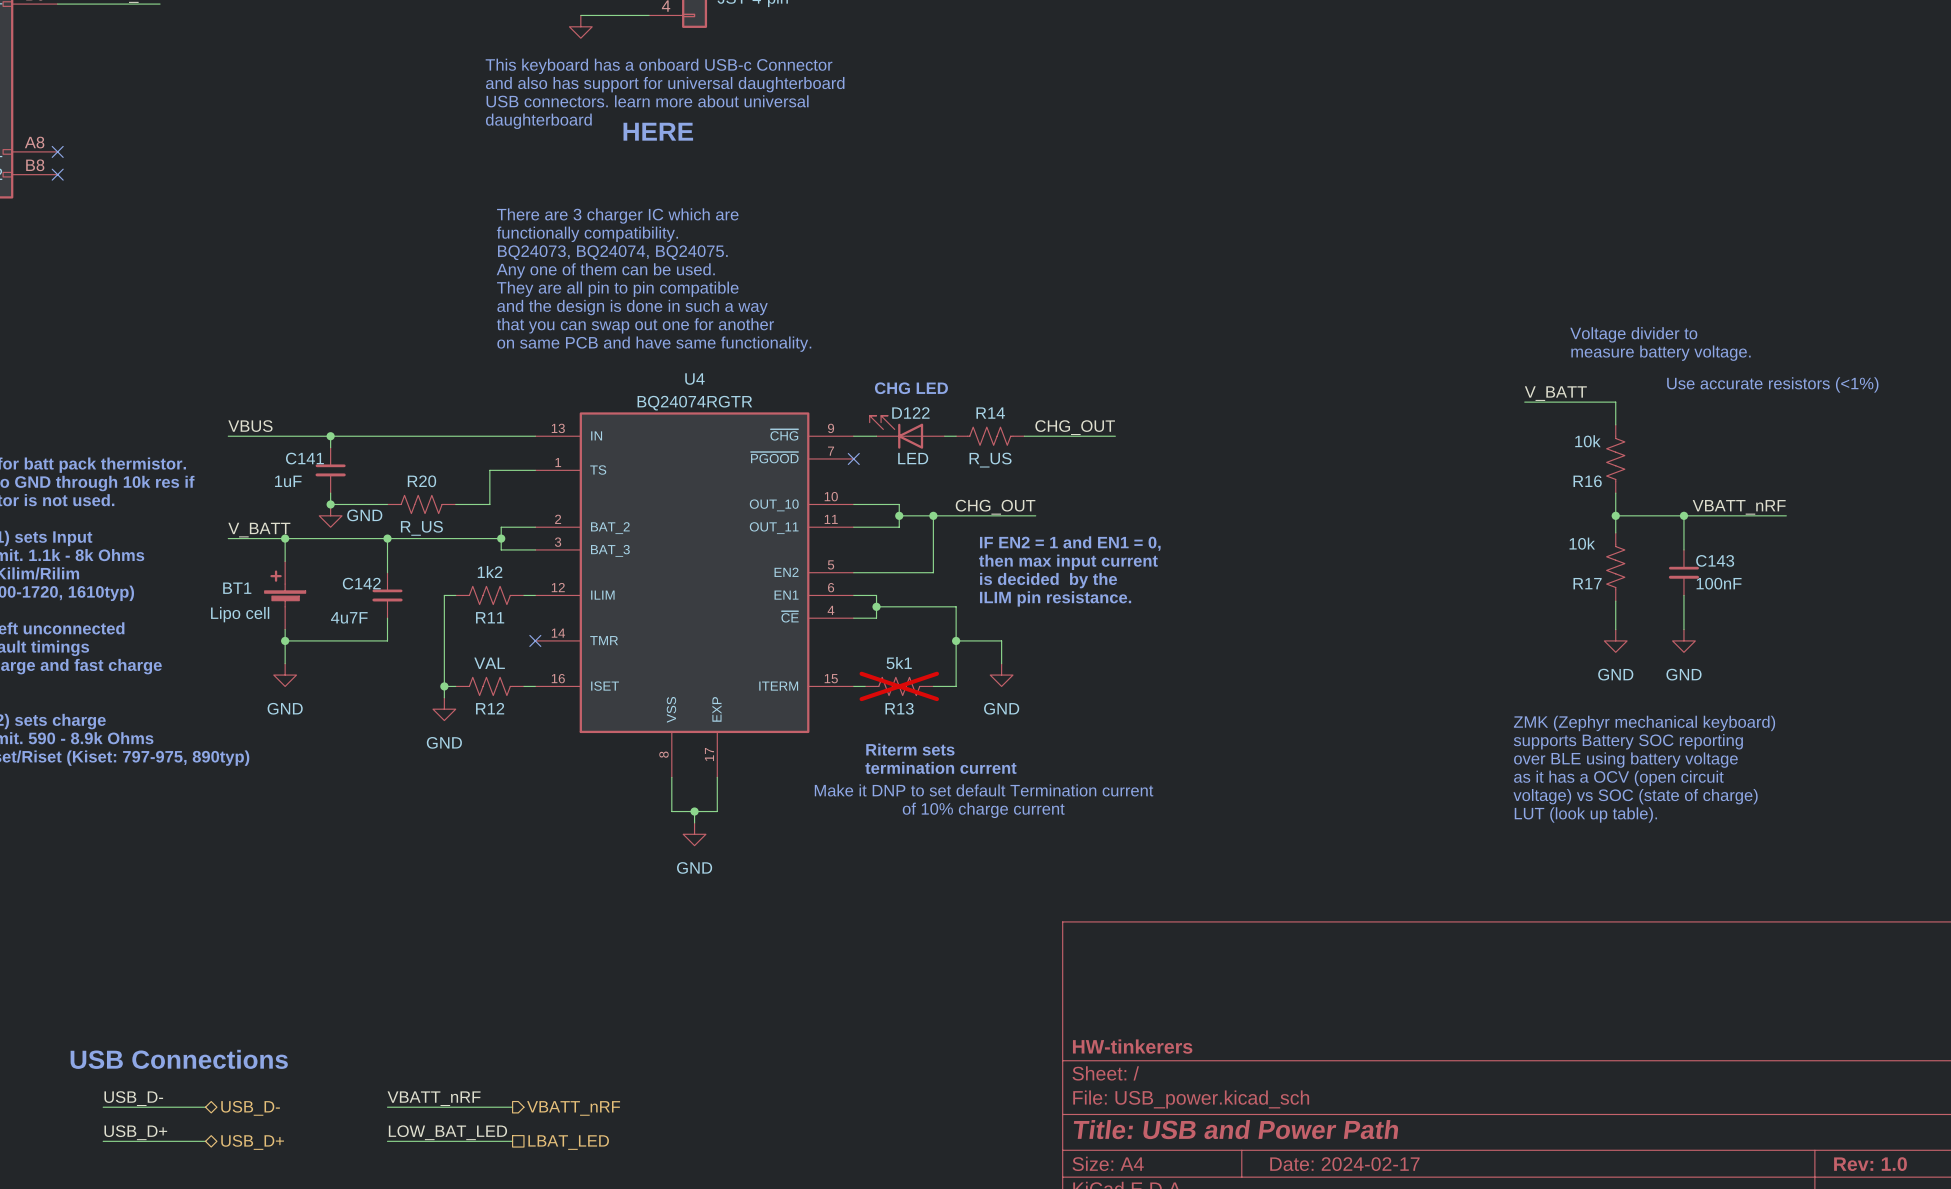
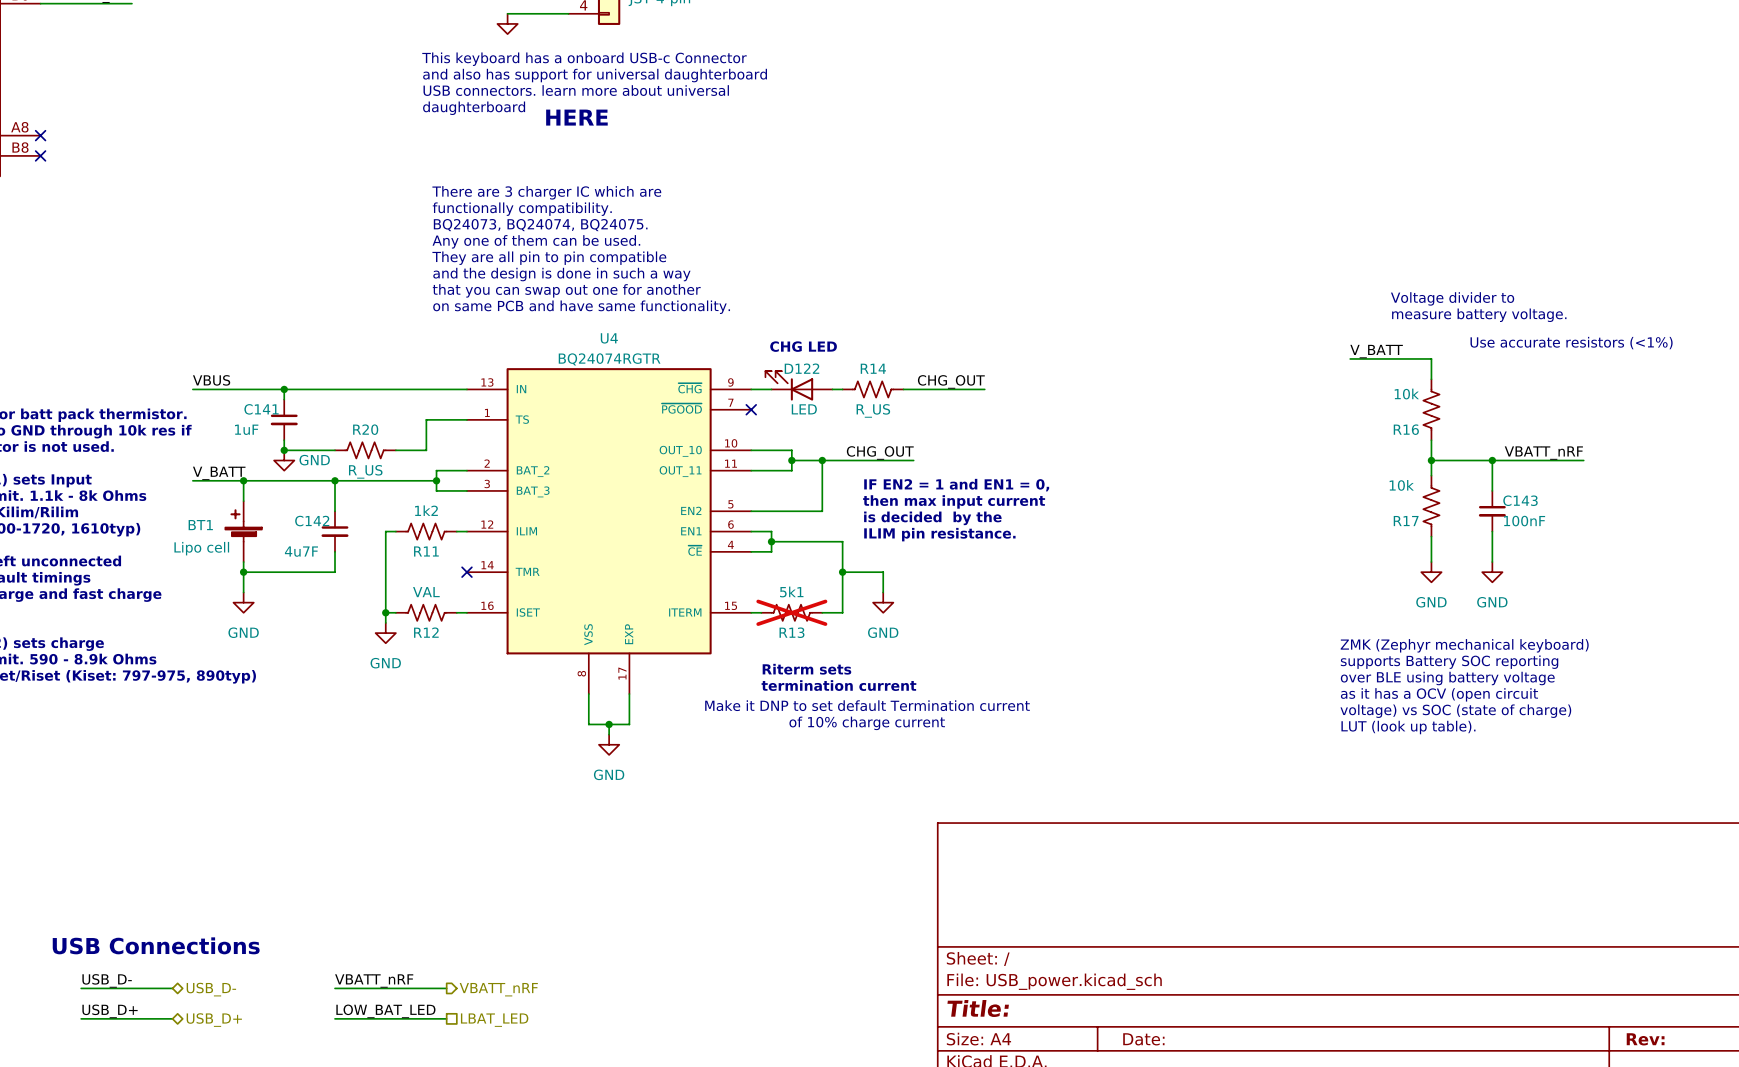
title block: HW-tinkerers (1132, 1046) -> none
title block: Title: USB and Power Path (1236, 1129) -> Title: (978, 1008)
title block: Date: 2024-02-17 (1344, 1164) -> Date: (1143, 1039)
title block: Rev: 1.0 (1870, 1164) -> Rev: (1645, 1039)

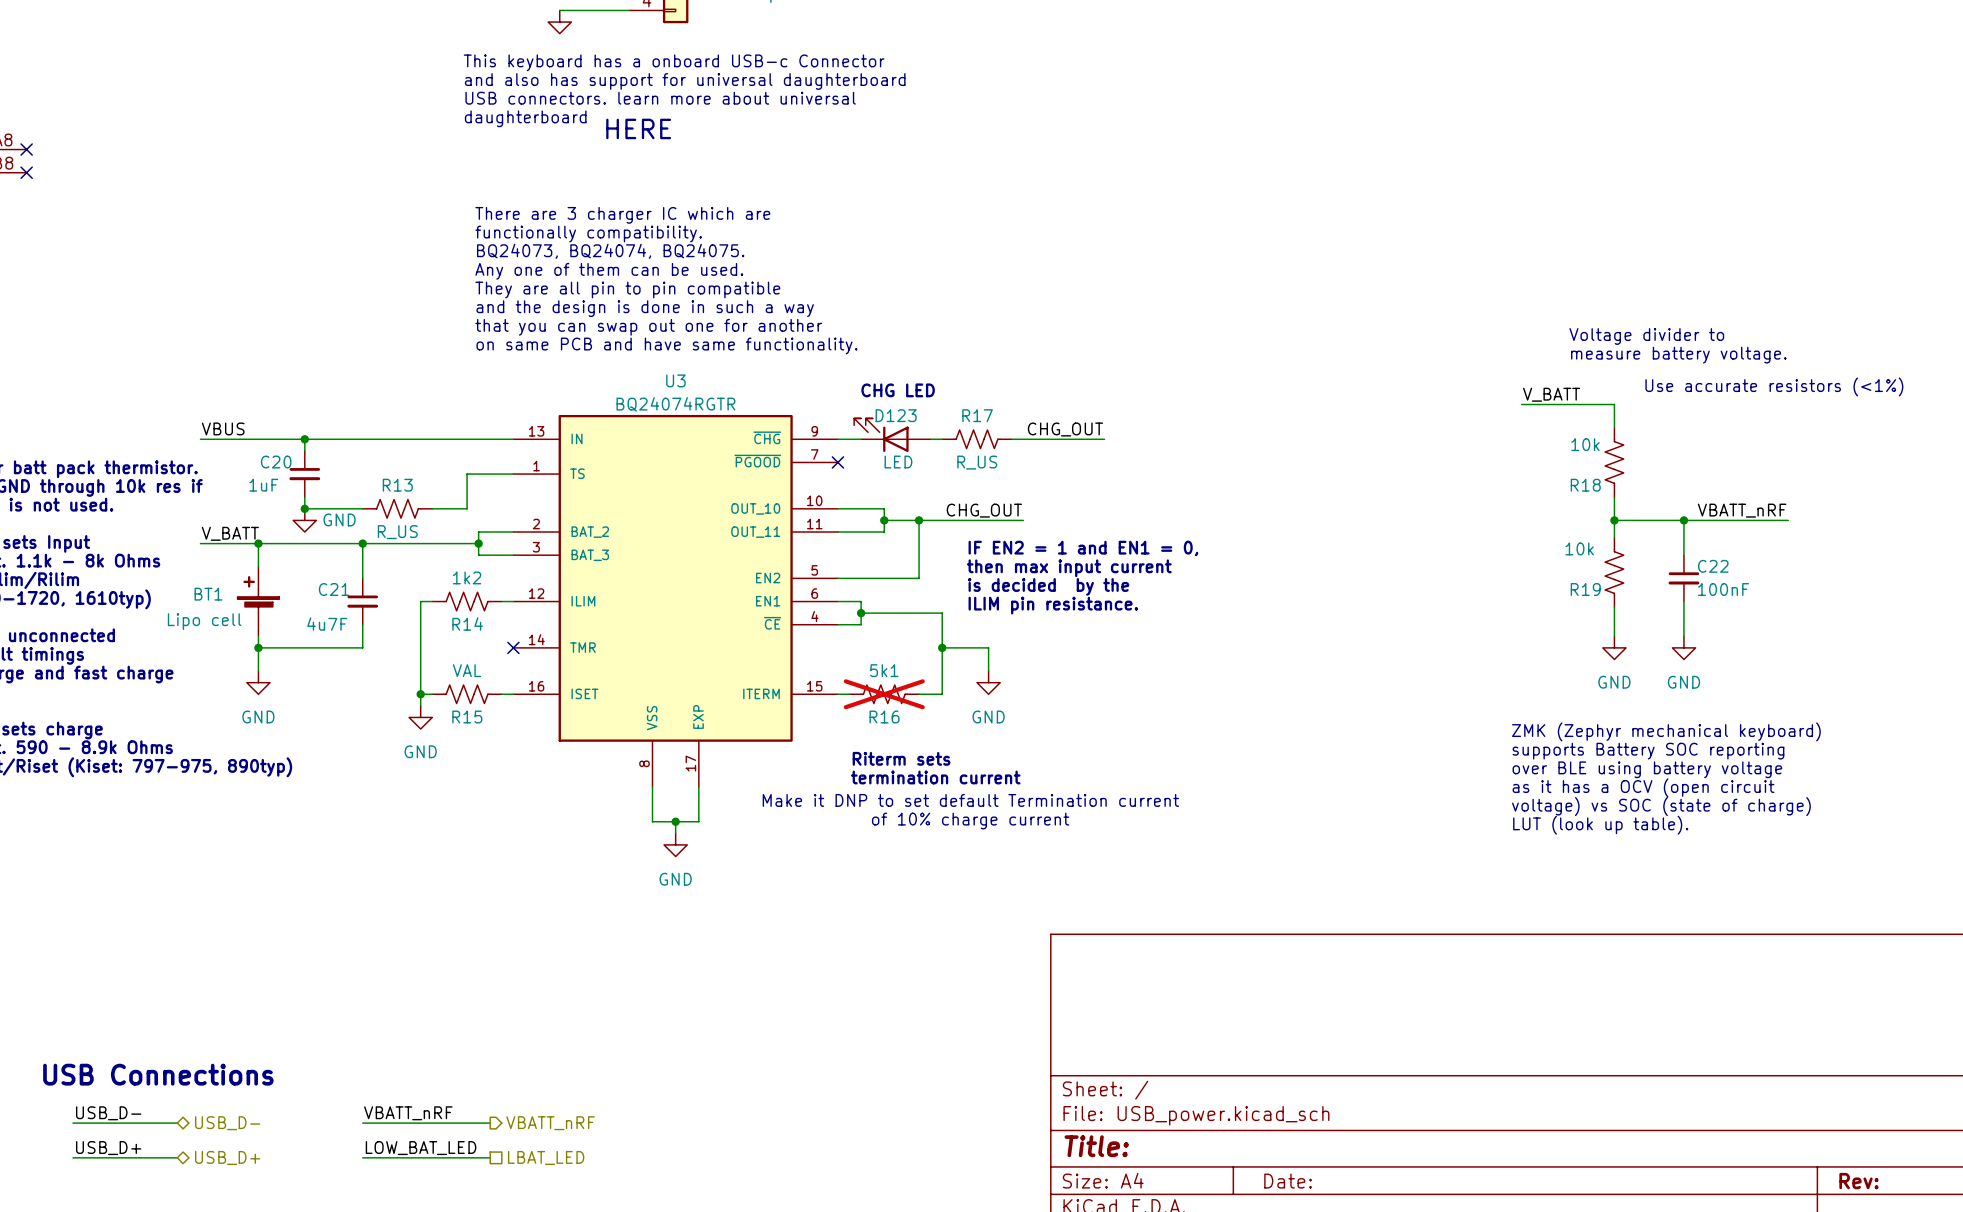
U4 name: U4 (609, 338) -> U3 (675, 380)
D122 name: D122 (801, 368) -> D123 (896, 415)
R14 name: R14 (873, 368) -> R17 (977, 415)
C141 name: C141 (261, 409) -> C20 (276, 462)
R20 name: R20 (365, 429) -> R13 (397, 485)
R16 name: R16 (1406, 429) -> R18 (1585, 485)
C143 name: C143 (1520, 500) -> C22 (1713, 566)
C142 name: C142 (312, 521) -> C21 (334, 589)
R17 name: R17 (1406, 521) -> R19 (1585, 589)
R11 name: R11 (426, 551) -> R14 (467, 624)
R12 name: R12 (426, 632) -> R15 (467, 717)
R13 name: R13 (791, 632) -> R16 (884, 717)

